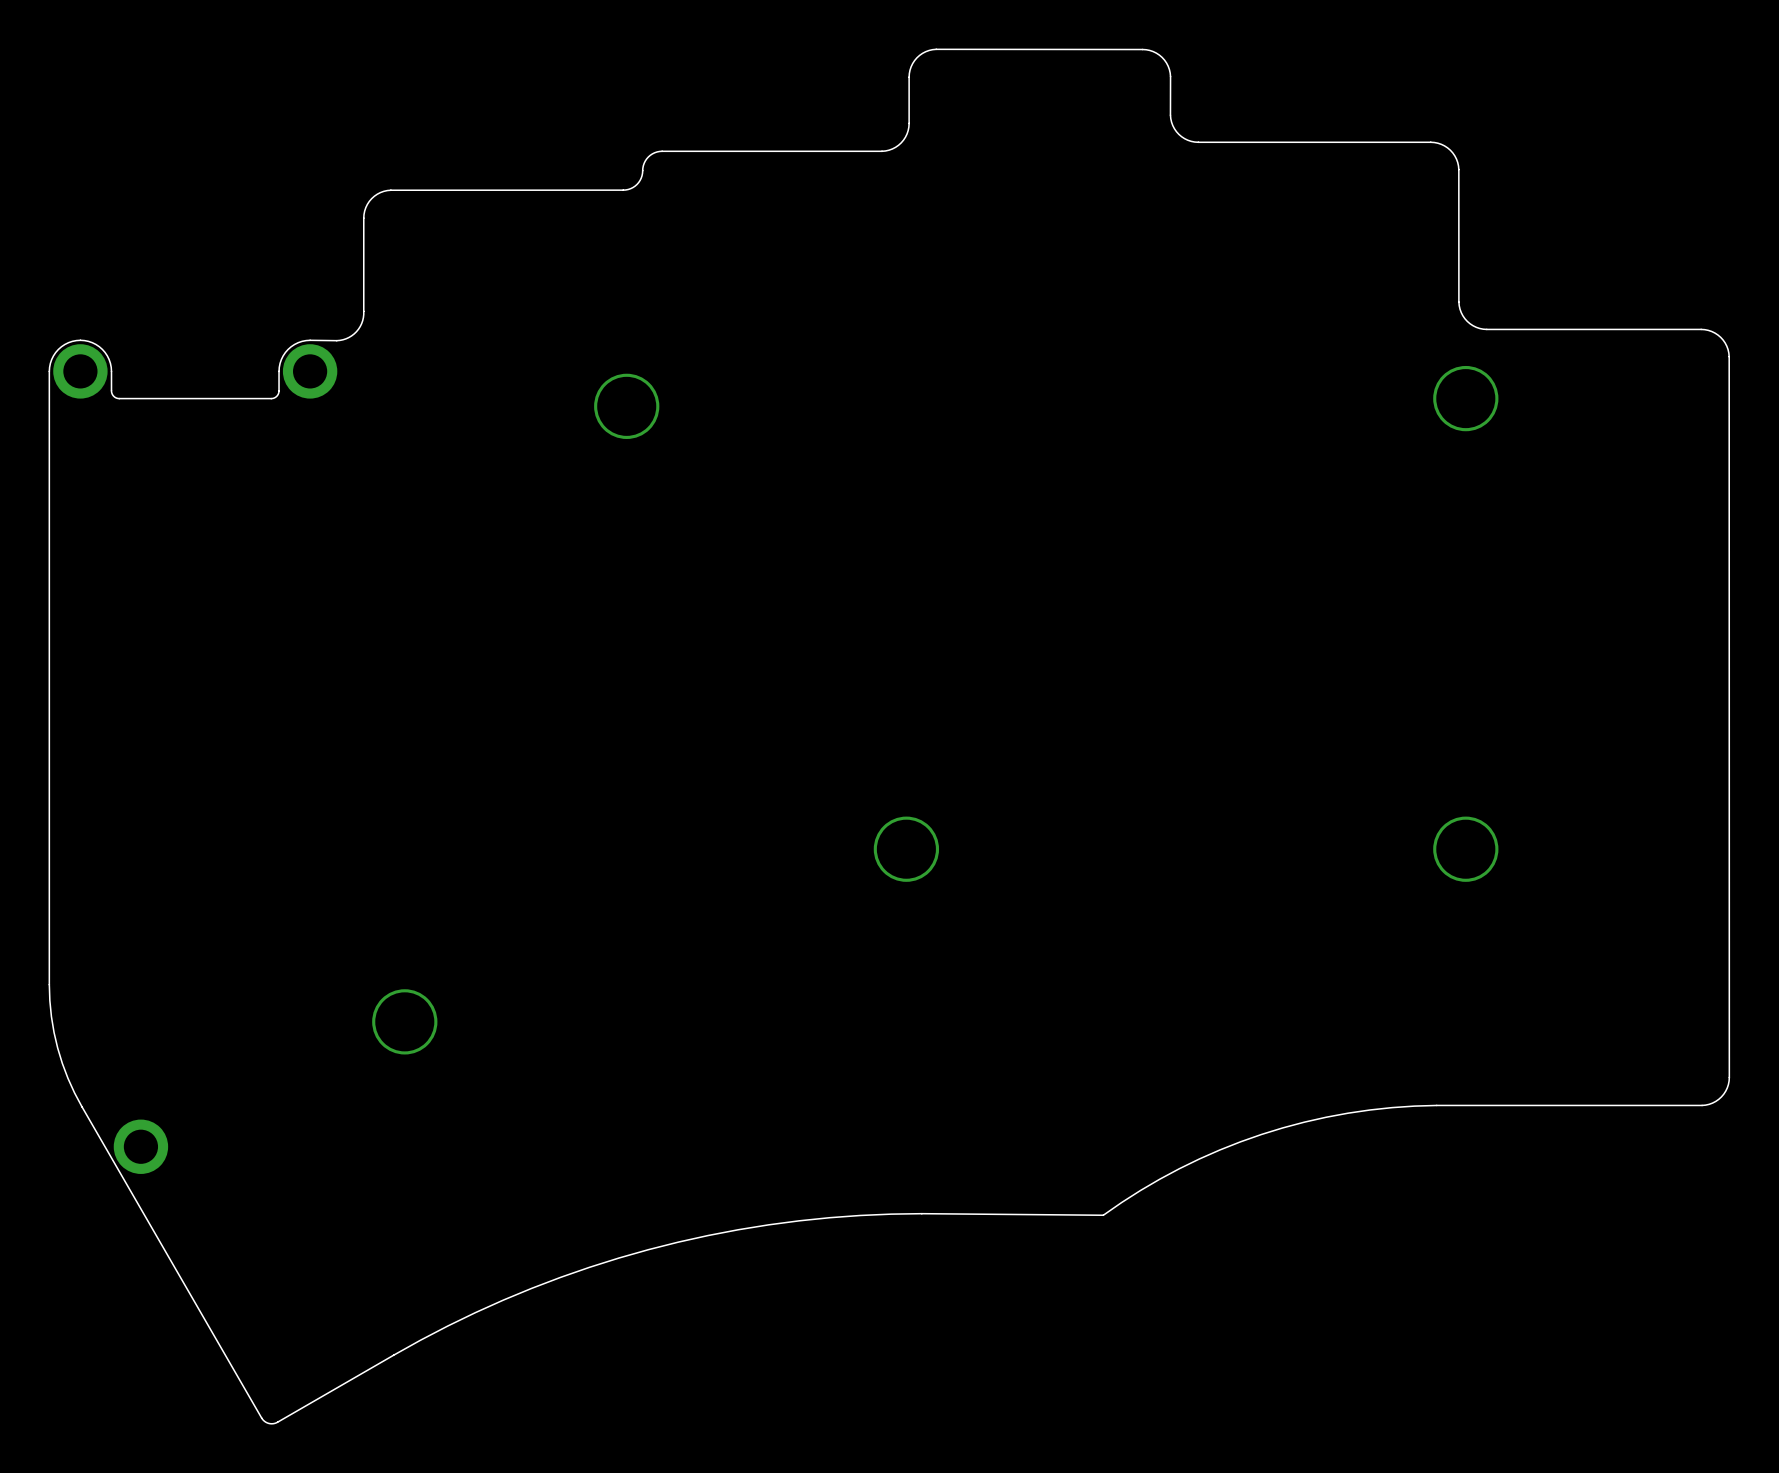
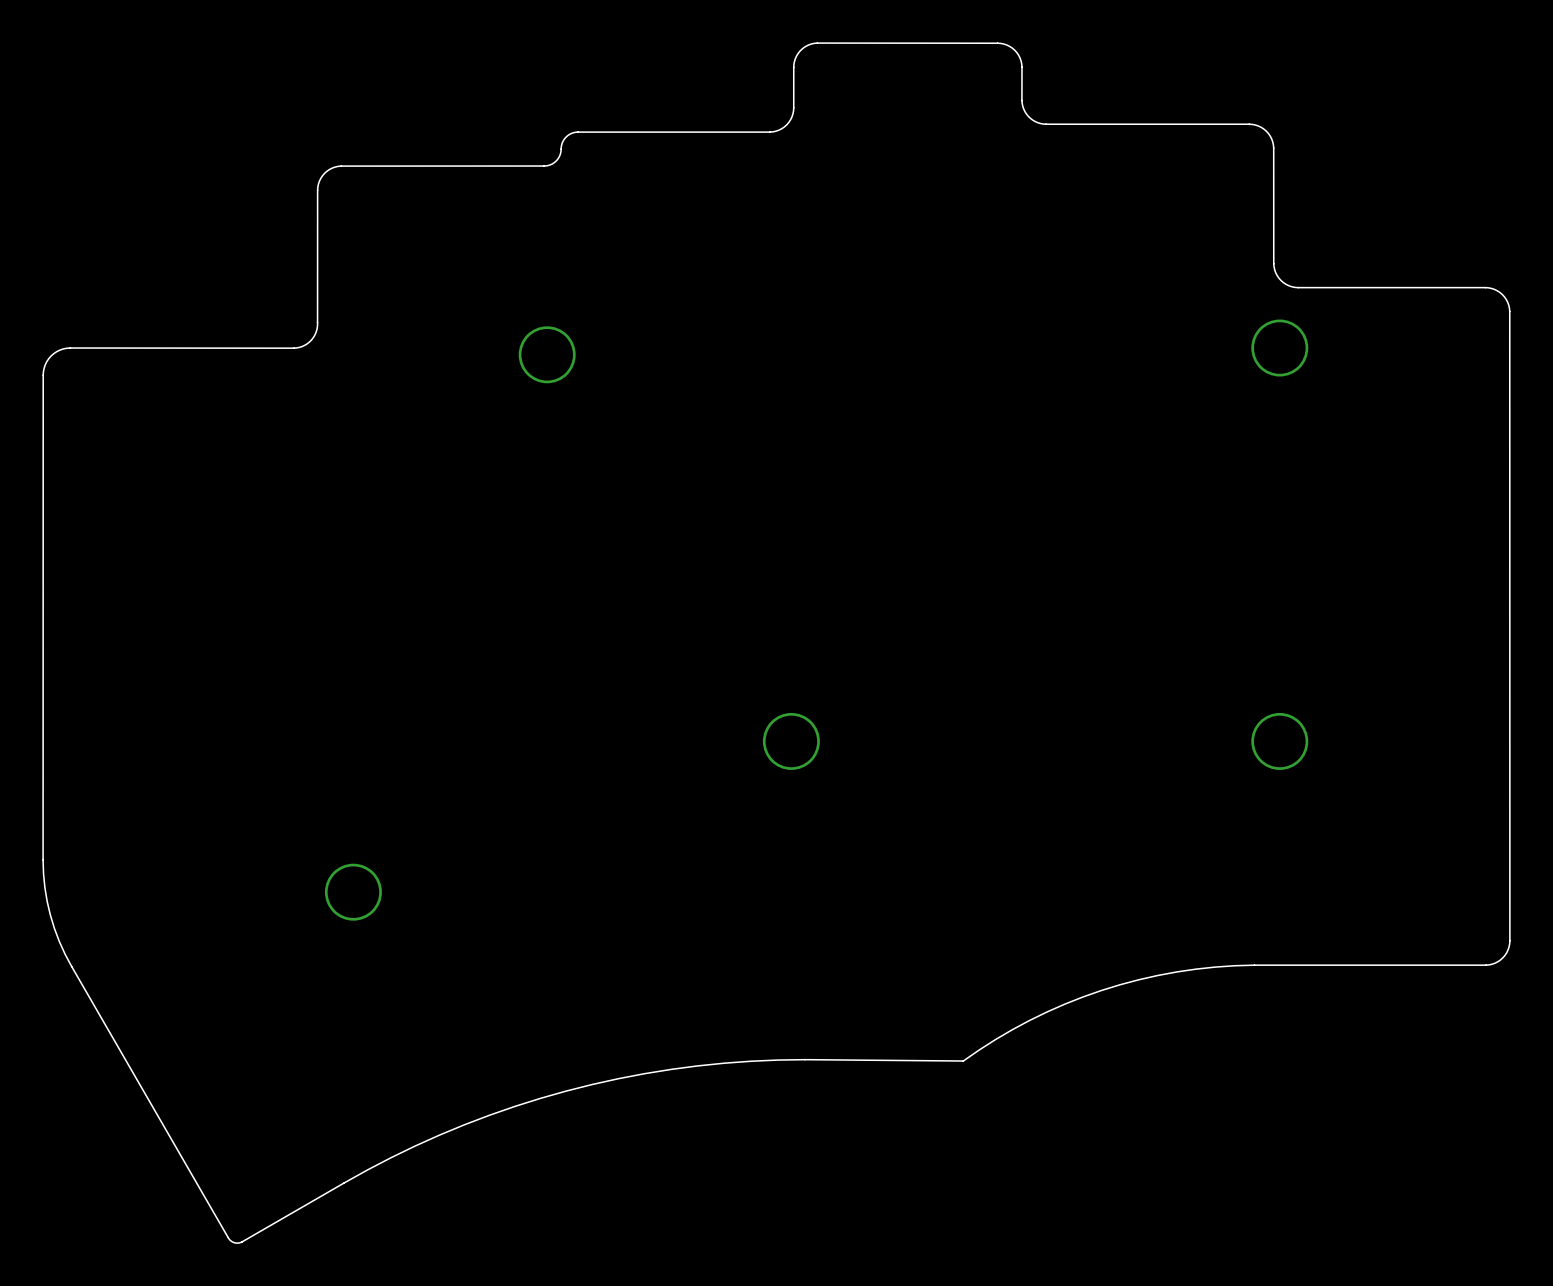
board edge: (363, 218) (363, 314) (360, 326) (354, 333) (343, 339) (306, 340) (291, 346) (283, 355) (280, 363) (278, 391) (274, 397) (118, 398) (111, 392) (109, 359) (102, 349) (95, 344) (84, 340) (72, 341) (58, 349) (51, 359) (49, 371) (49, 984) -> (317, 190) (317, 325) (314, 335) (306, 343) (293, 348) (66, 348) (53, 353) (45, 364) (43, 375) (43, 859)
part: (80, 371) -> none
part: (310, 371) -> none
part: (140, 1146) -> none

